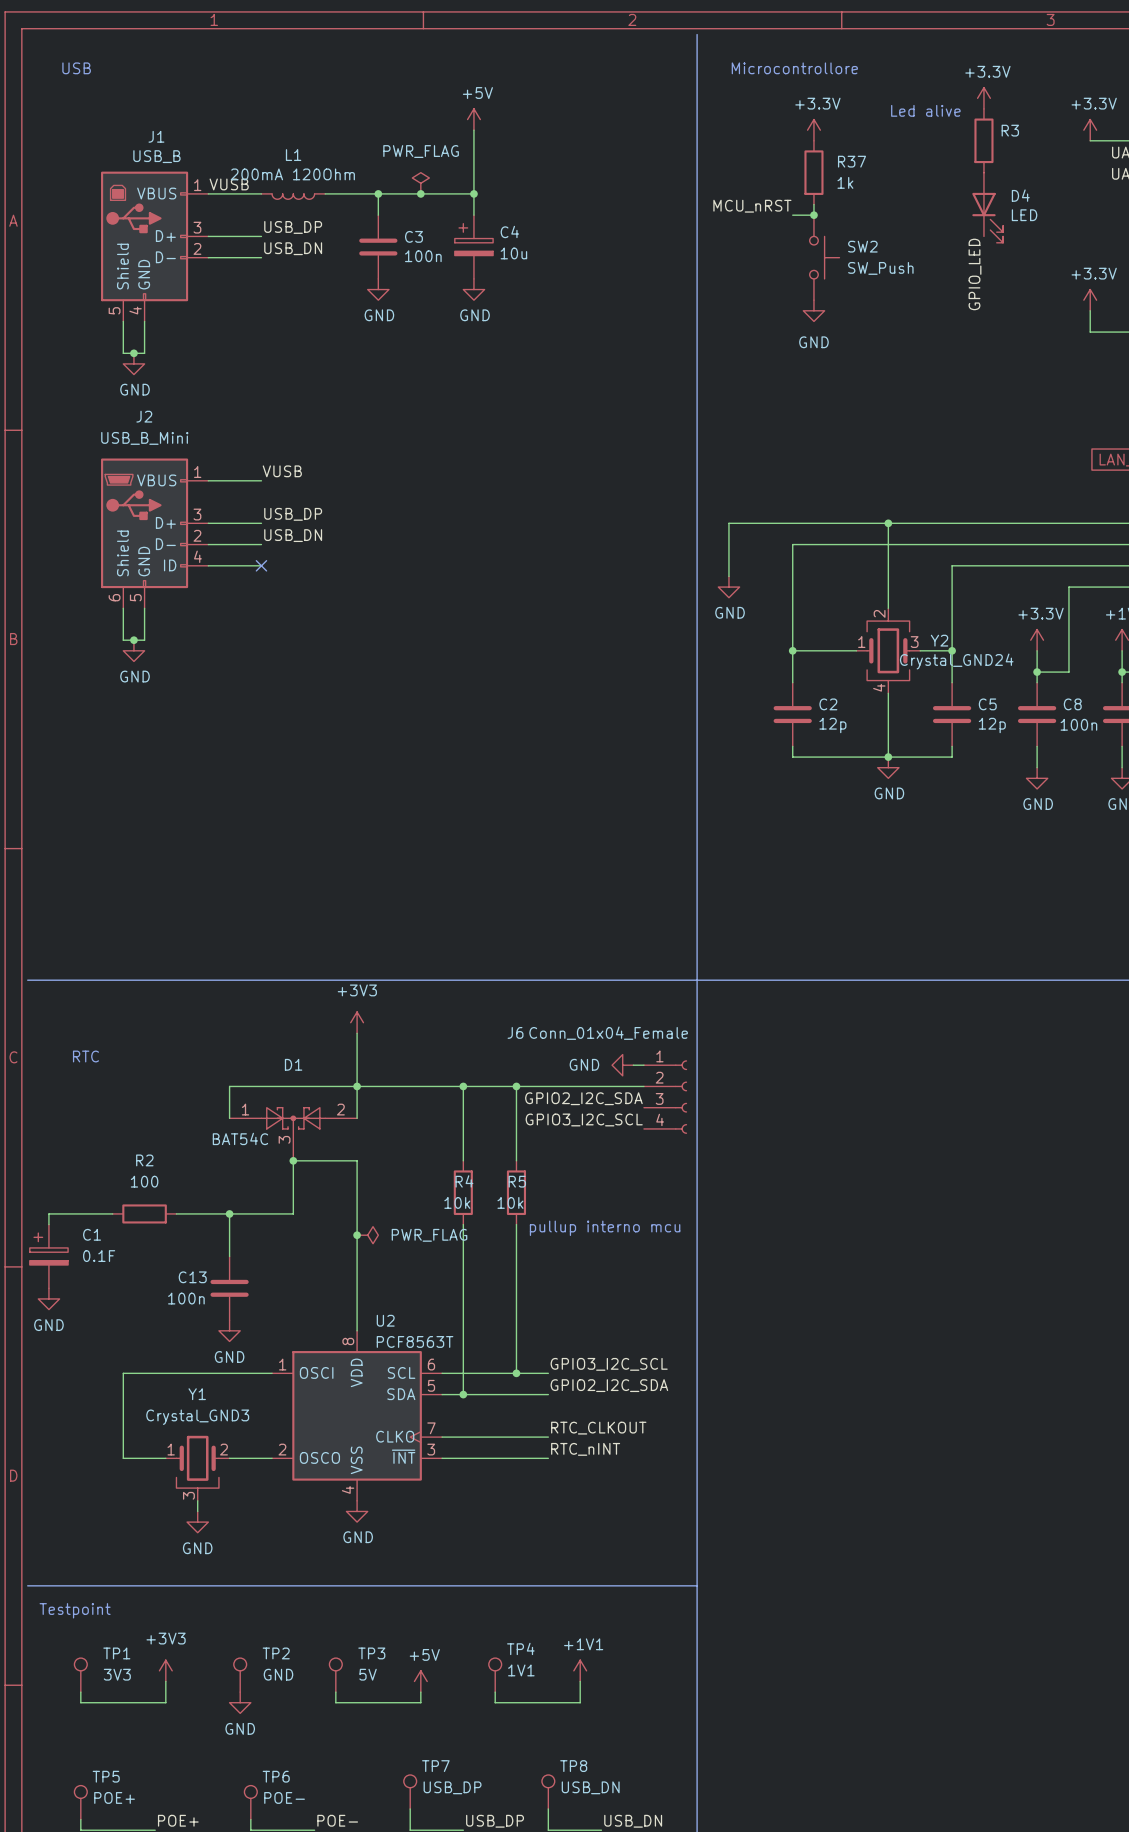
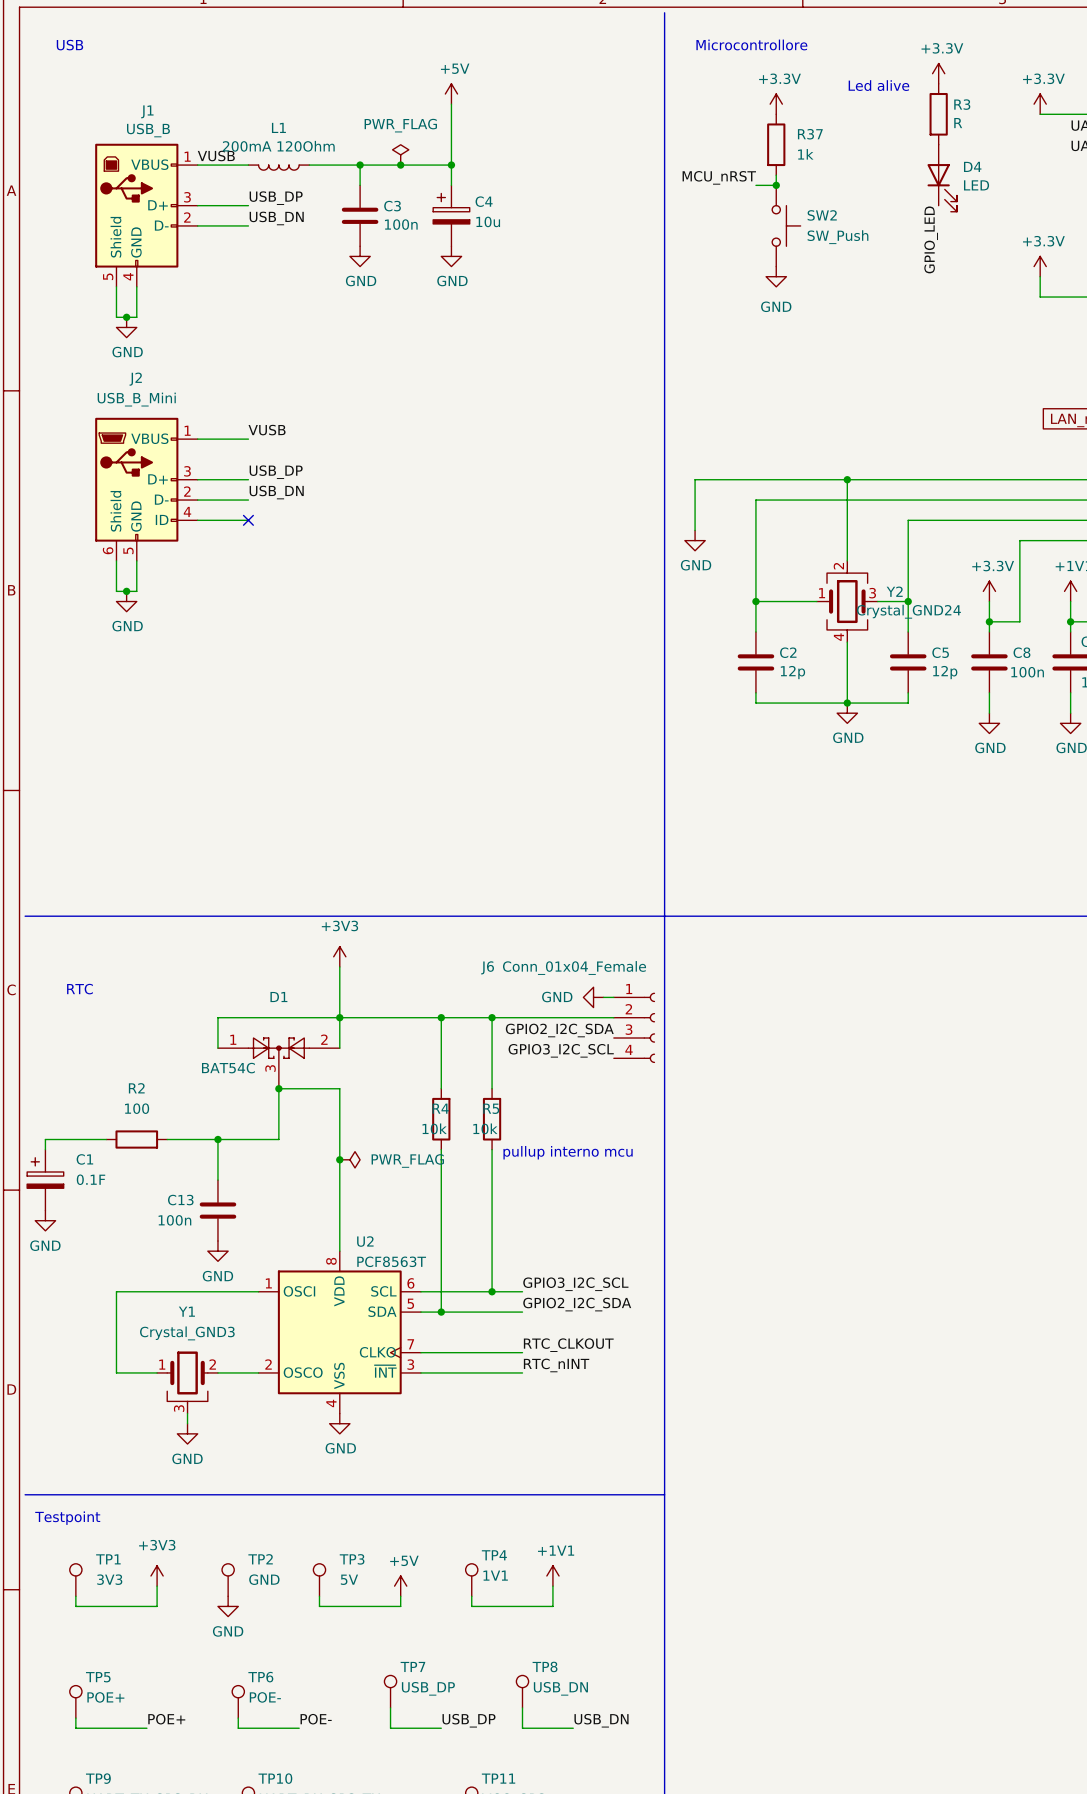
R3 value: none -> R (958, 123)

